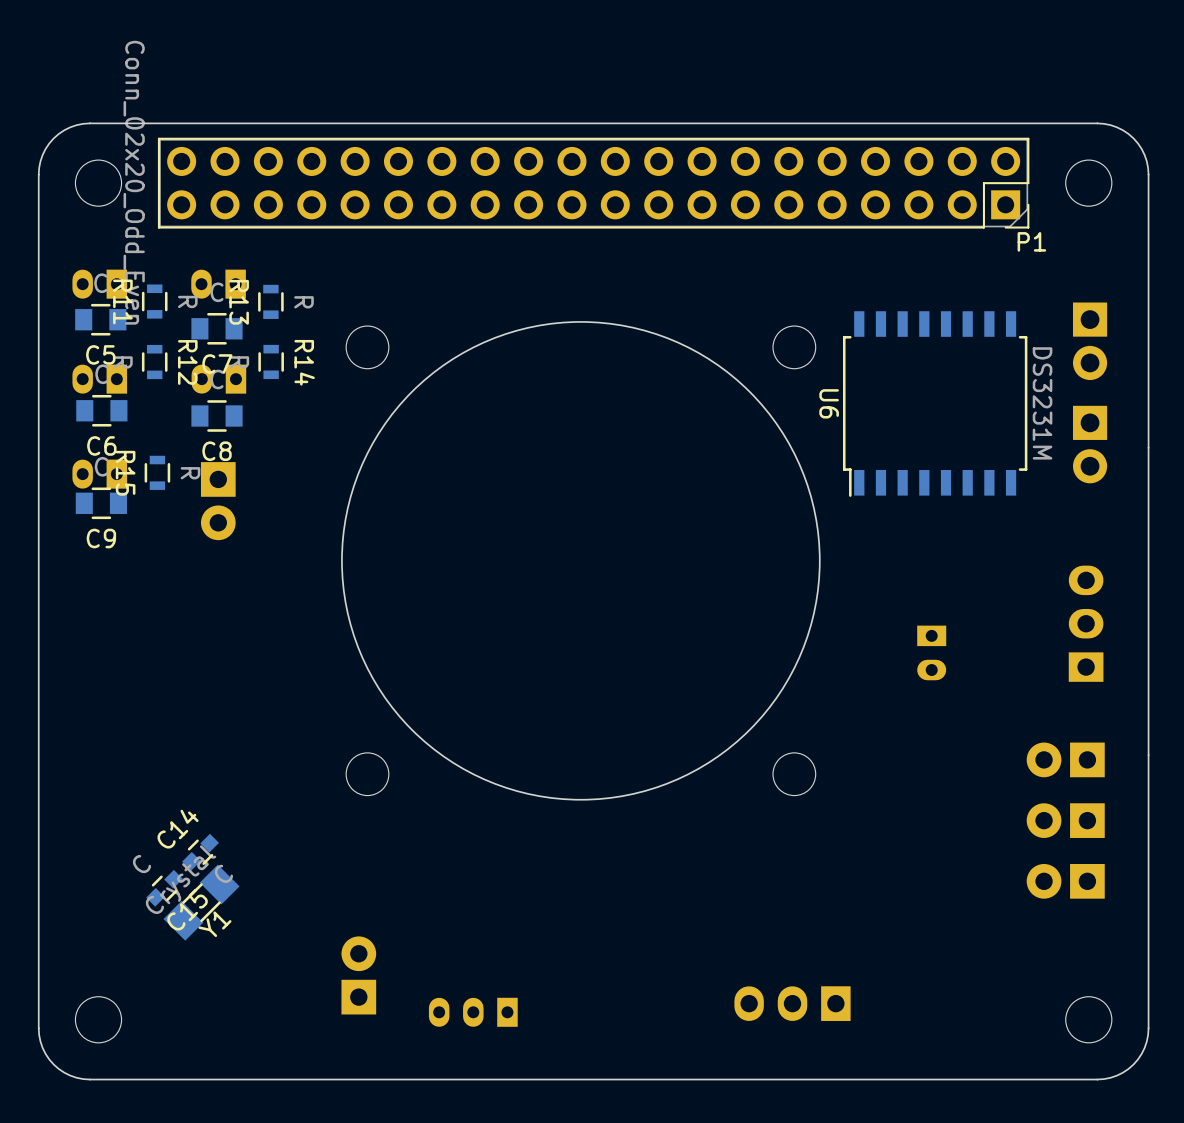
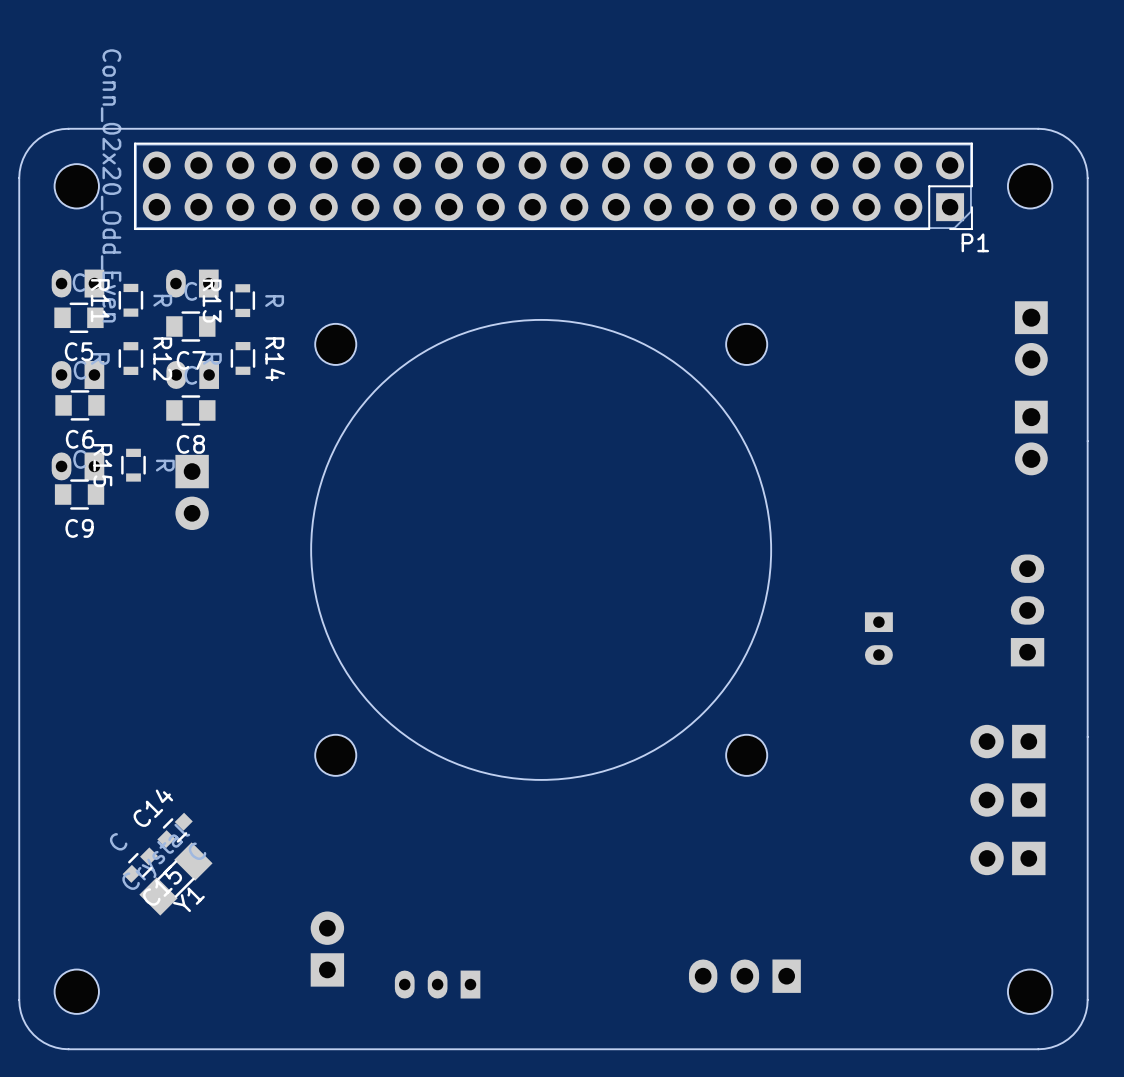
U6: DS3231M (935, 404) -> none

